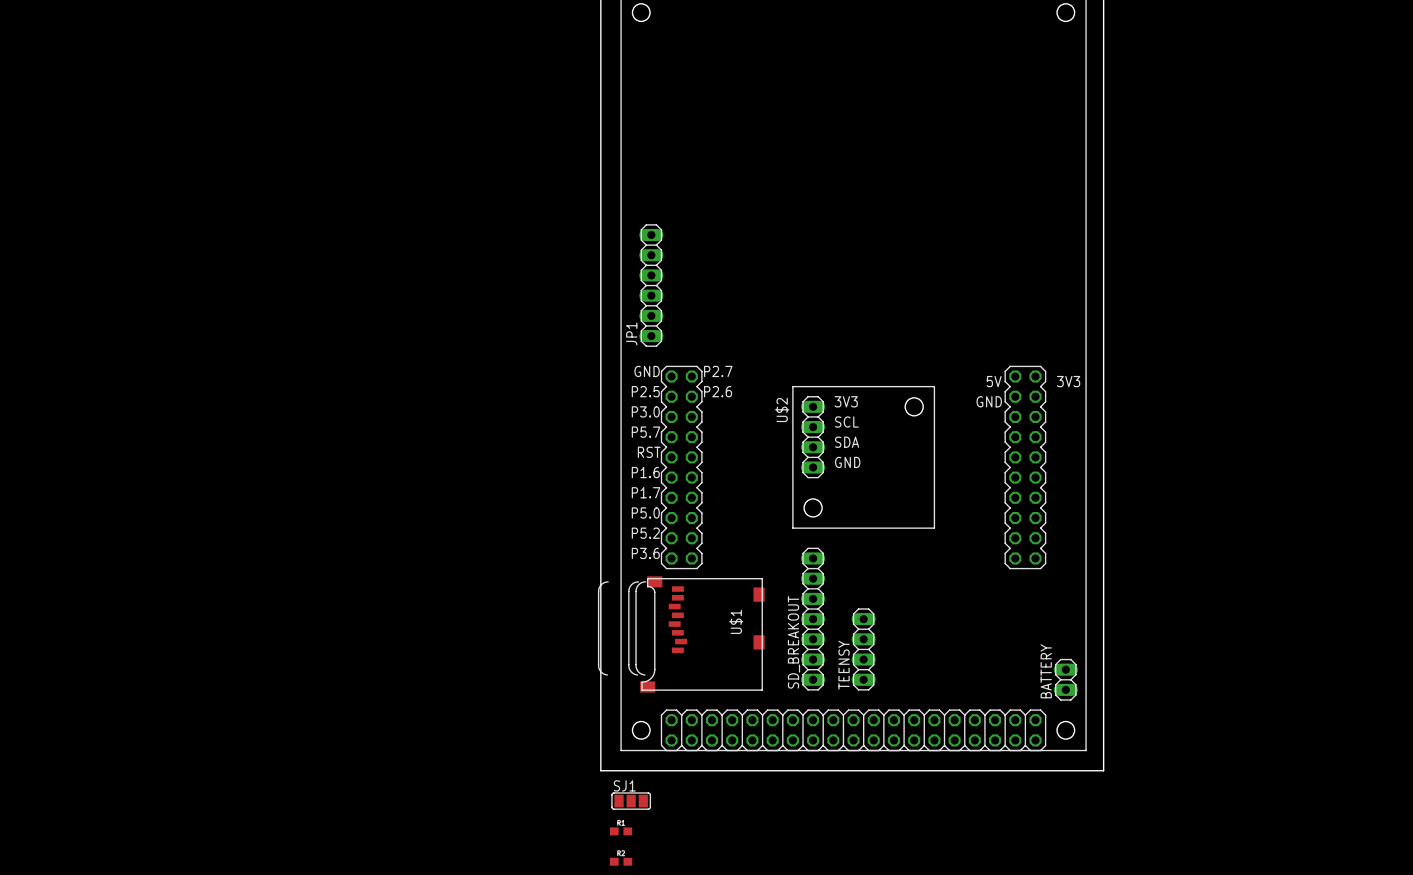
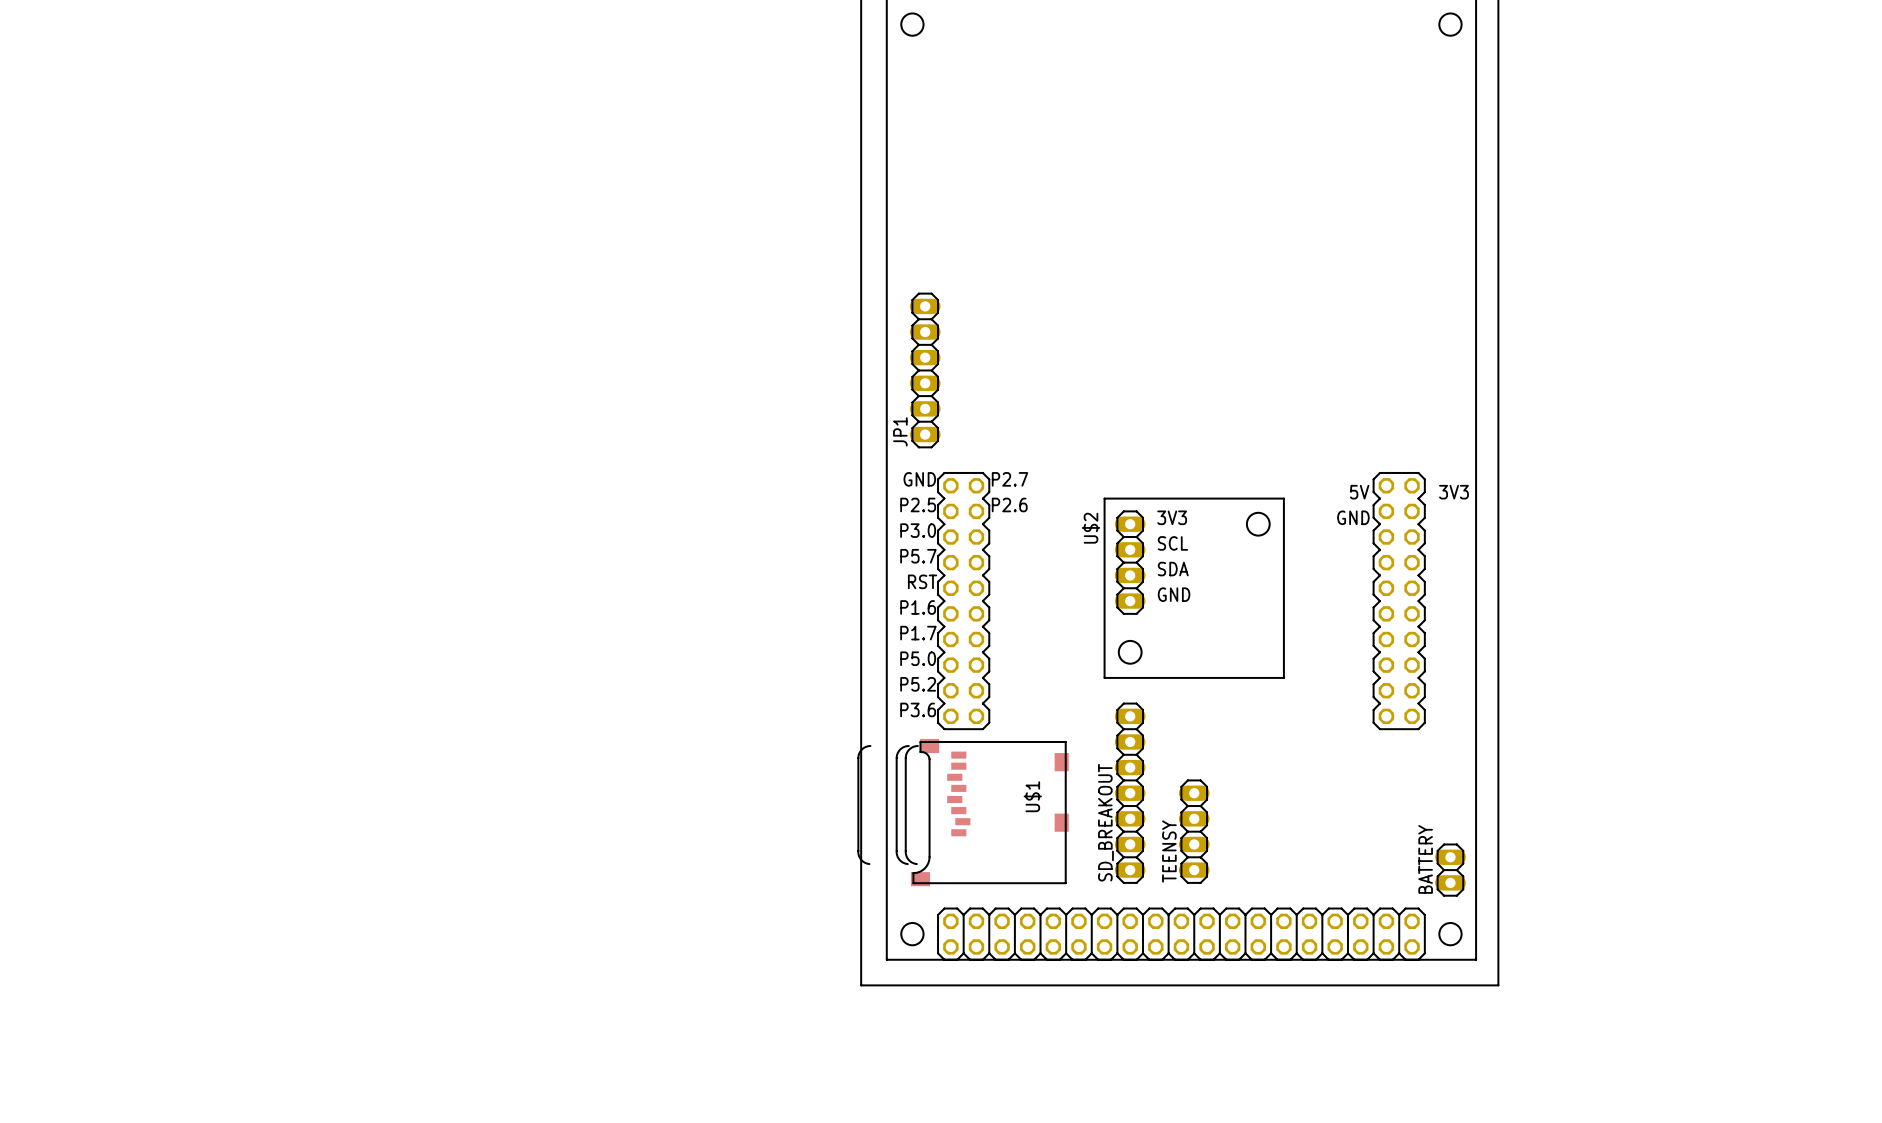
SJ1: (631, 801) -> none
part: (621, 831) -> none
part: (621, 861) -> none

